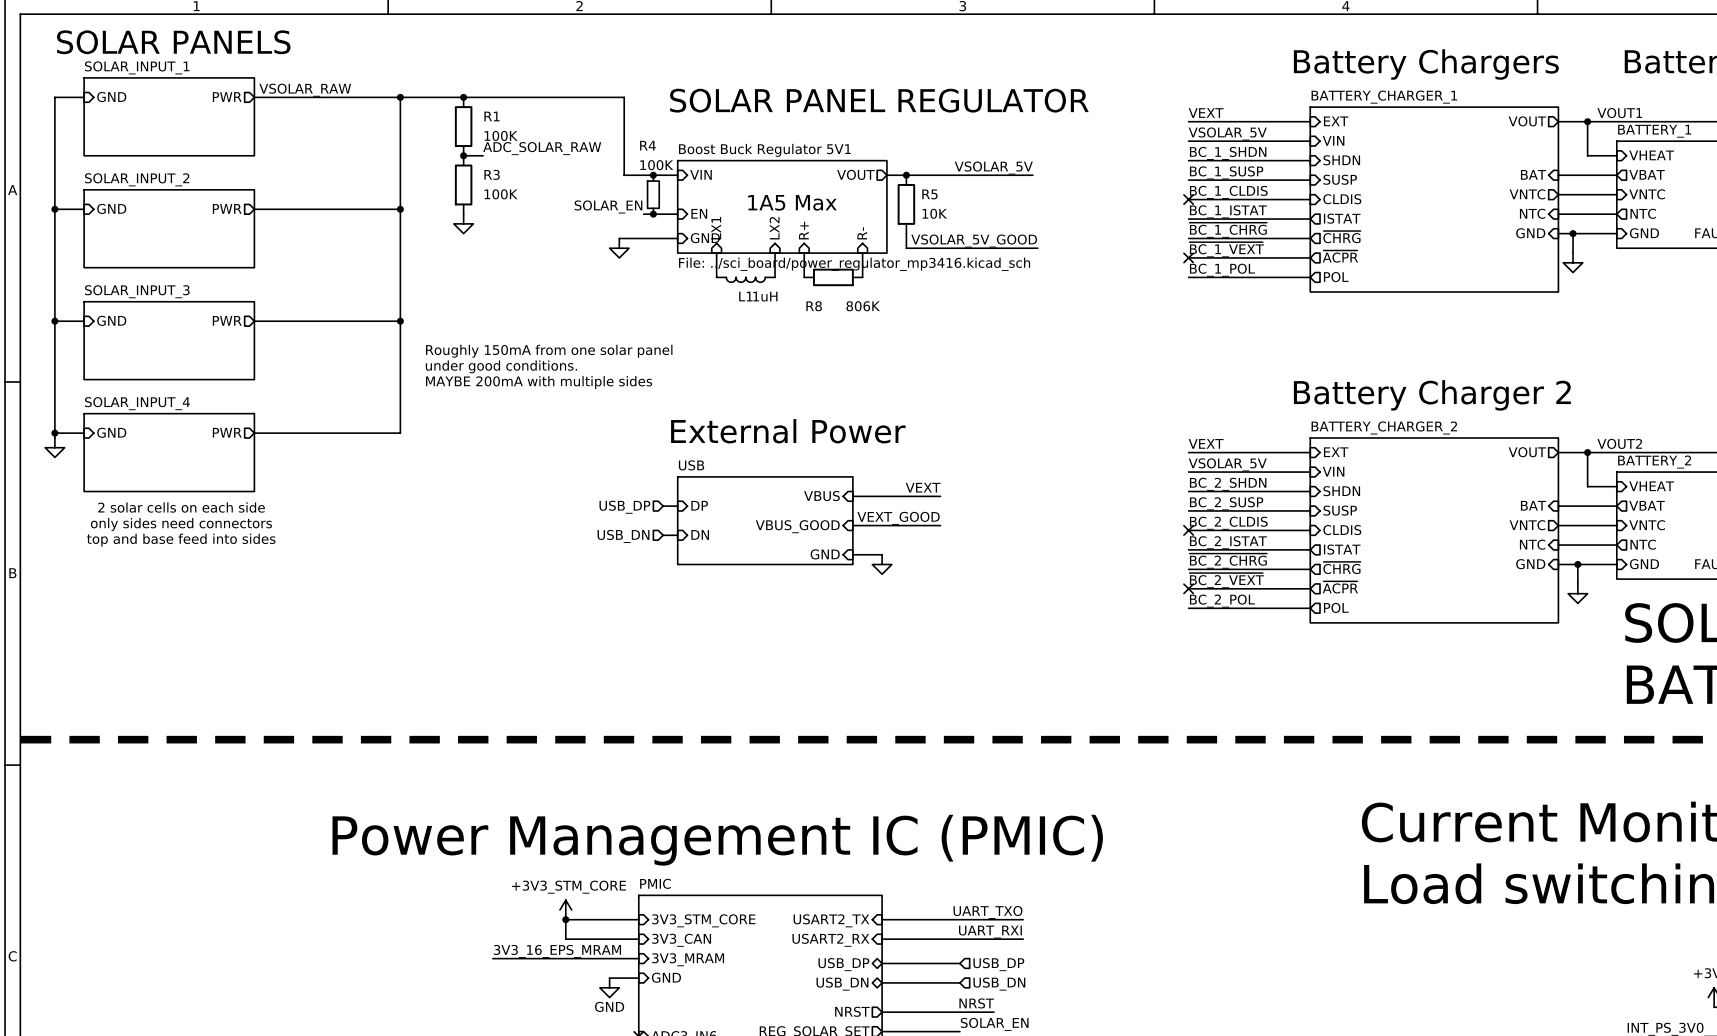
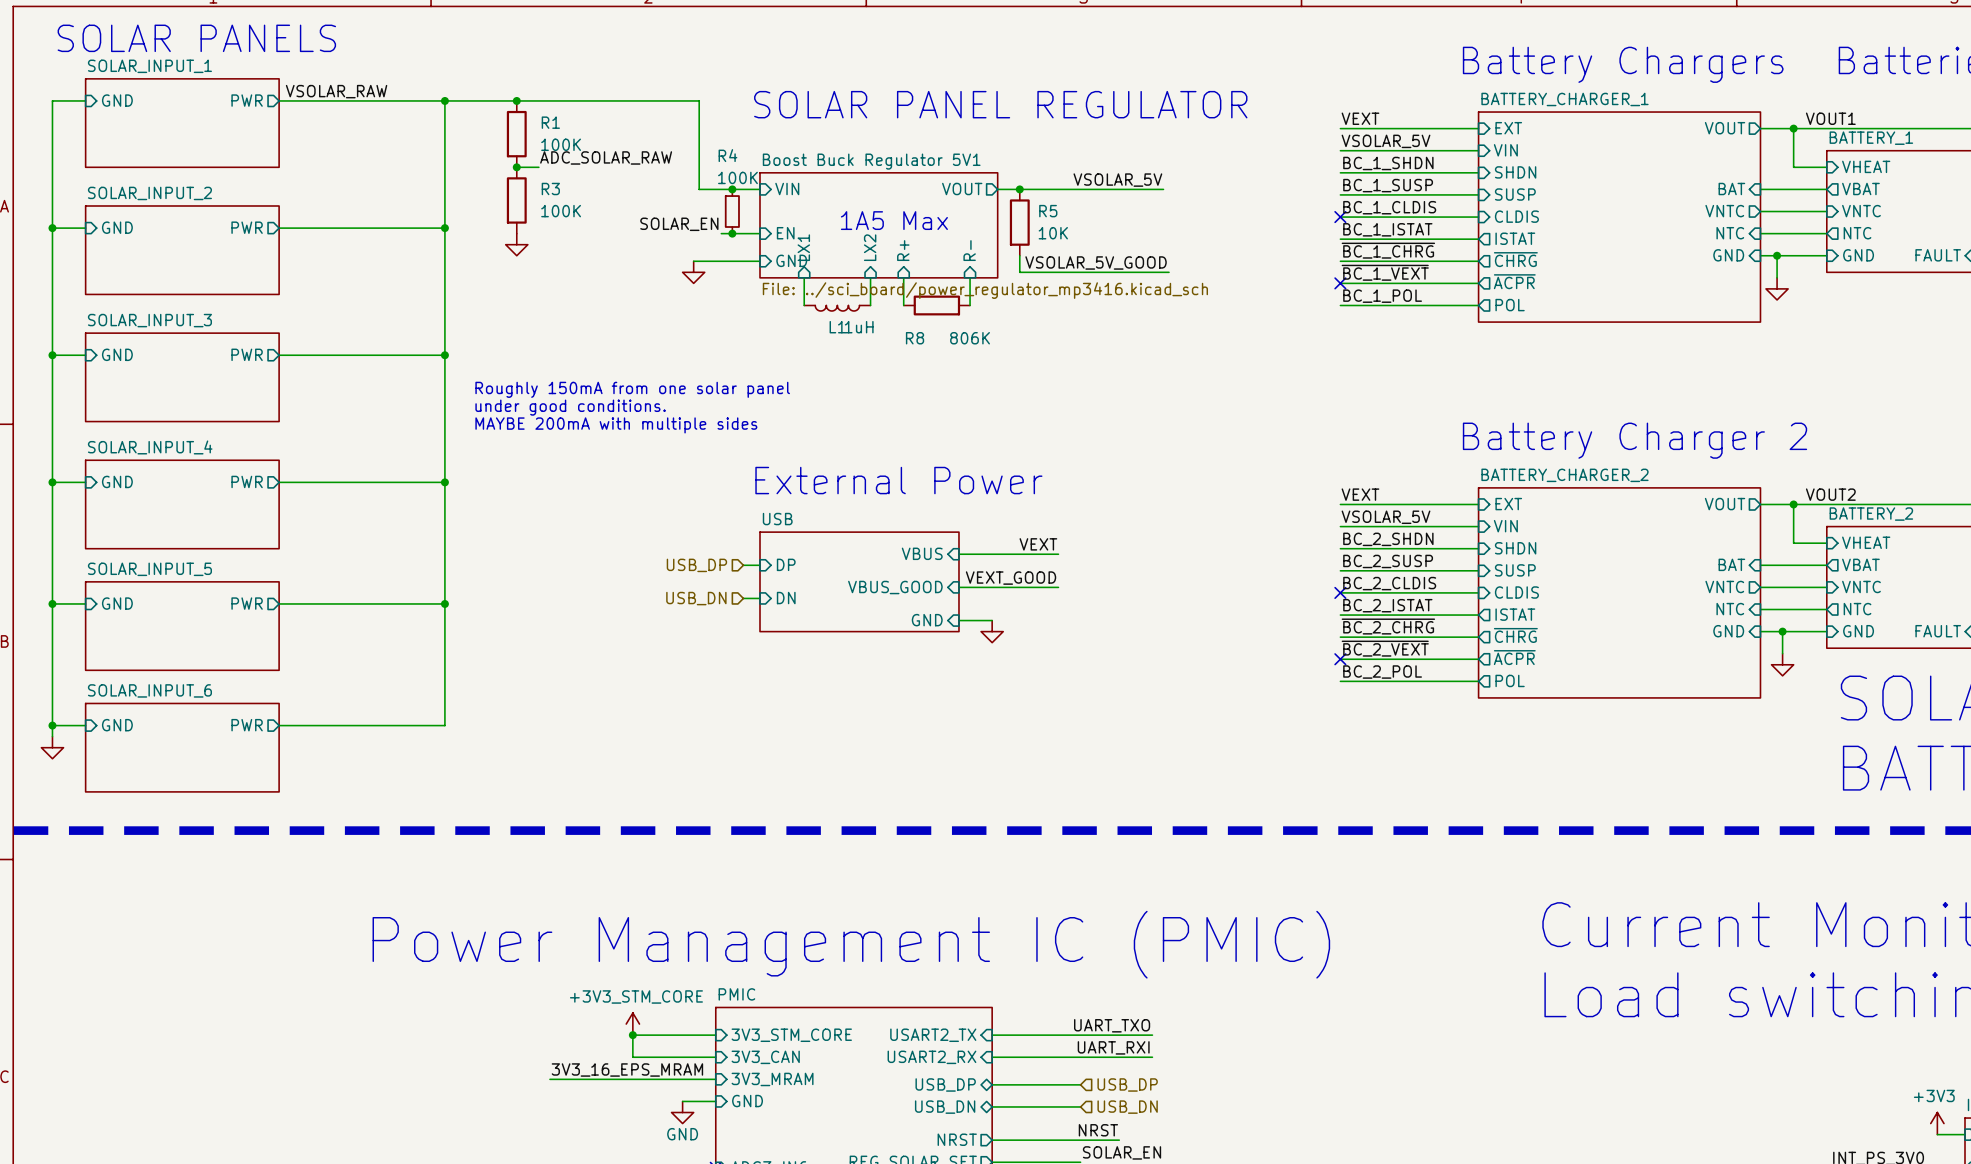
wire: none -> (444, 482) (444, 725) (279, 725)
junction: none -> (444, 482)
wire: none -> (52, 487) (52, 736)
power symbol: (54, 447) -> none
text: 2 solar cells on each side (181, 507) -> none
text: only sides need connectors (181, 524) -> none
sheet pin: none -> GND (117, 603)
sheet pin: none -> PWR (247, 603)
wire: none -> (52, 603) (85, 603)
junction: none -> (52, 603)
text: top and base feed into sides (181, 540) -> none
wire: none -> (279, 603) (444, 603)
junction: none -> (444, 603)
sheet SOLAR_INPUT_5: none -> (182, 626)
sheet pin: none -> GND (117, 725)
sheet pin: none -> PWR (247, 725)
wire: none -> (52, 725) (85, 725)
junction: none -> (52, 725)
power symbol: none -> (52, 747)
sheet SOLAR_INPUT_6: none -> (182, 747)

